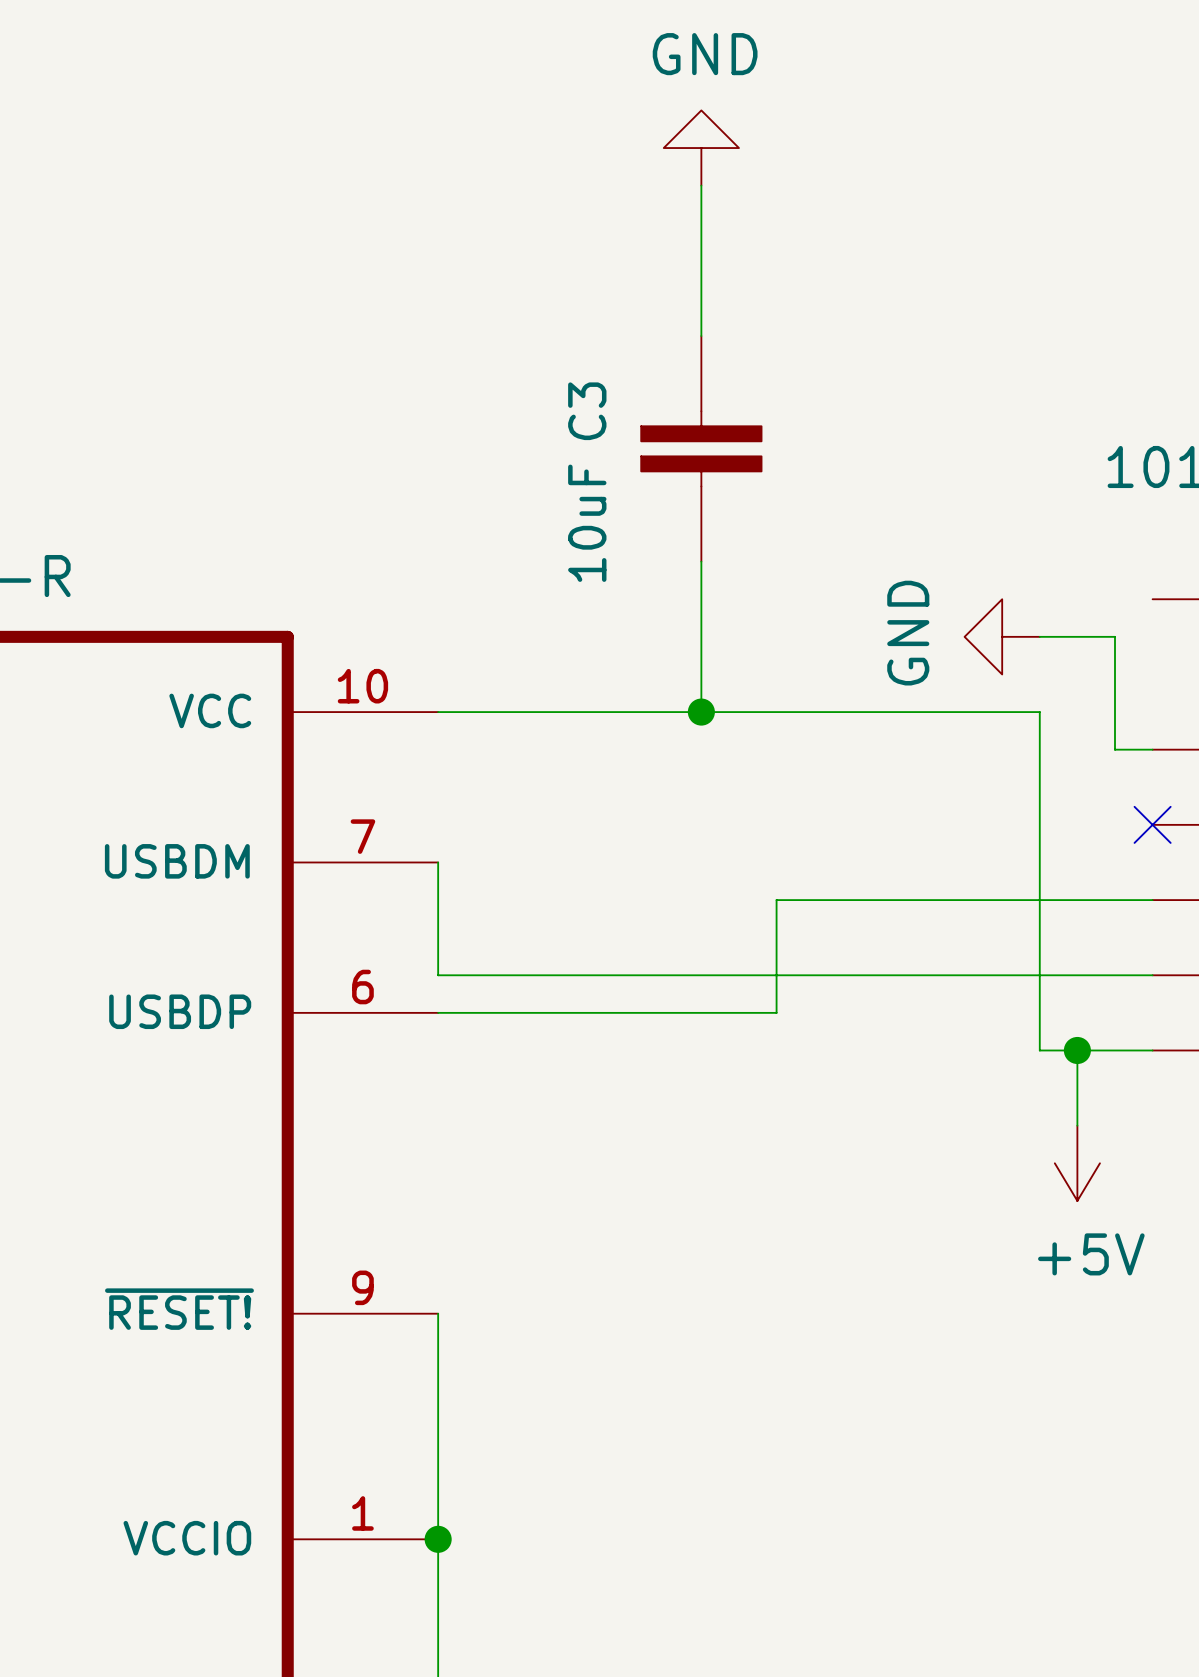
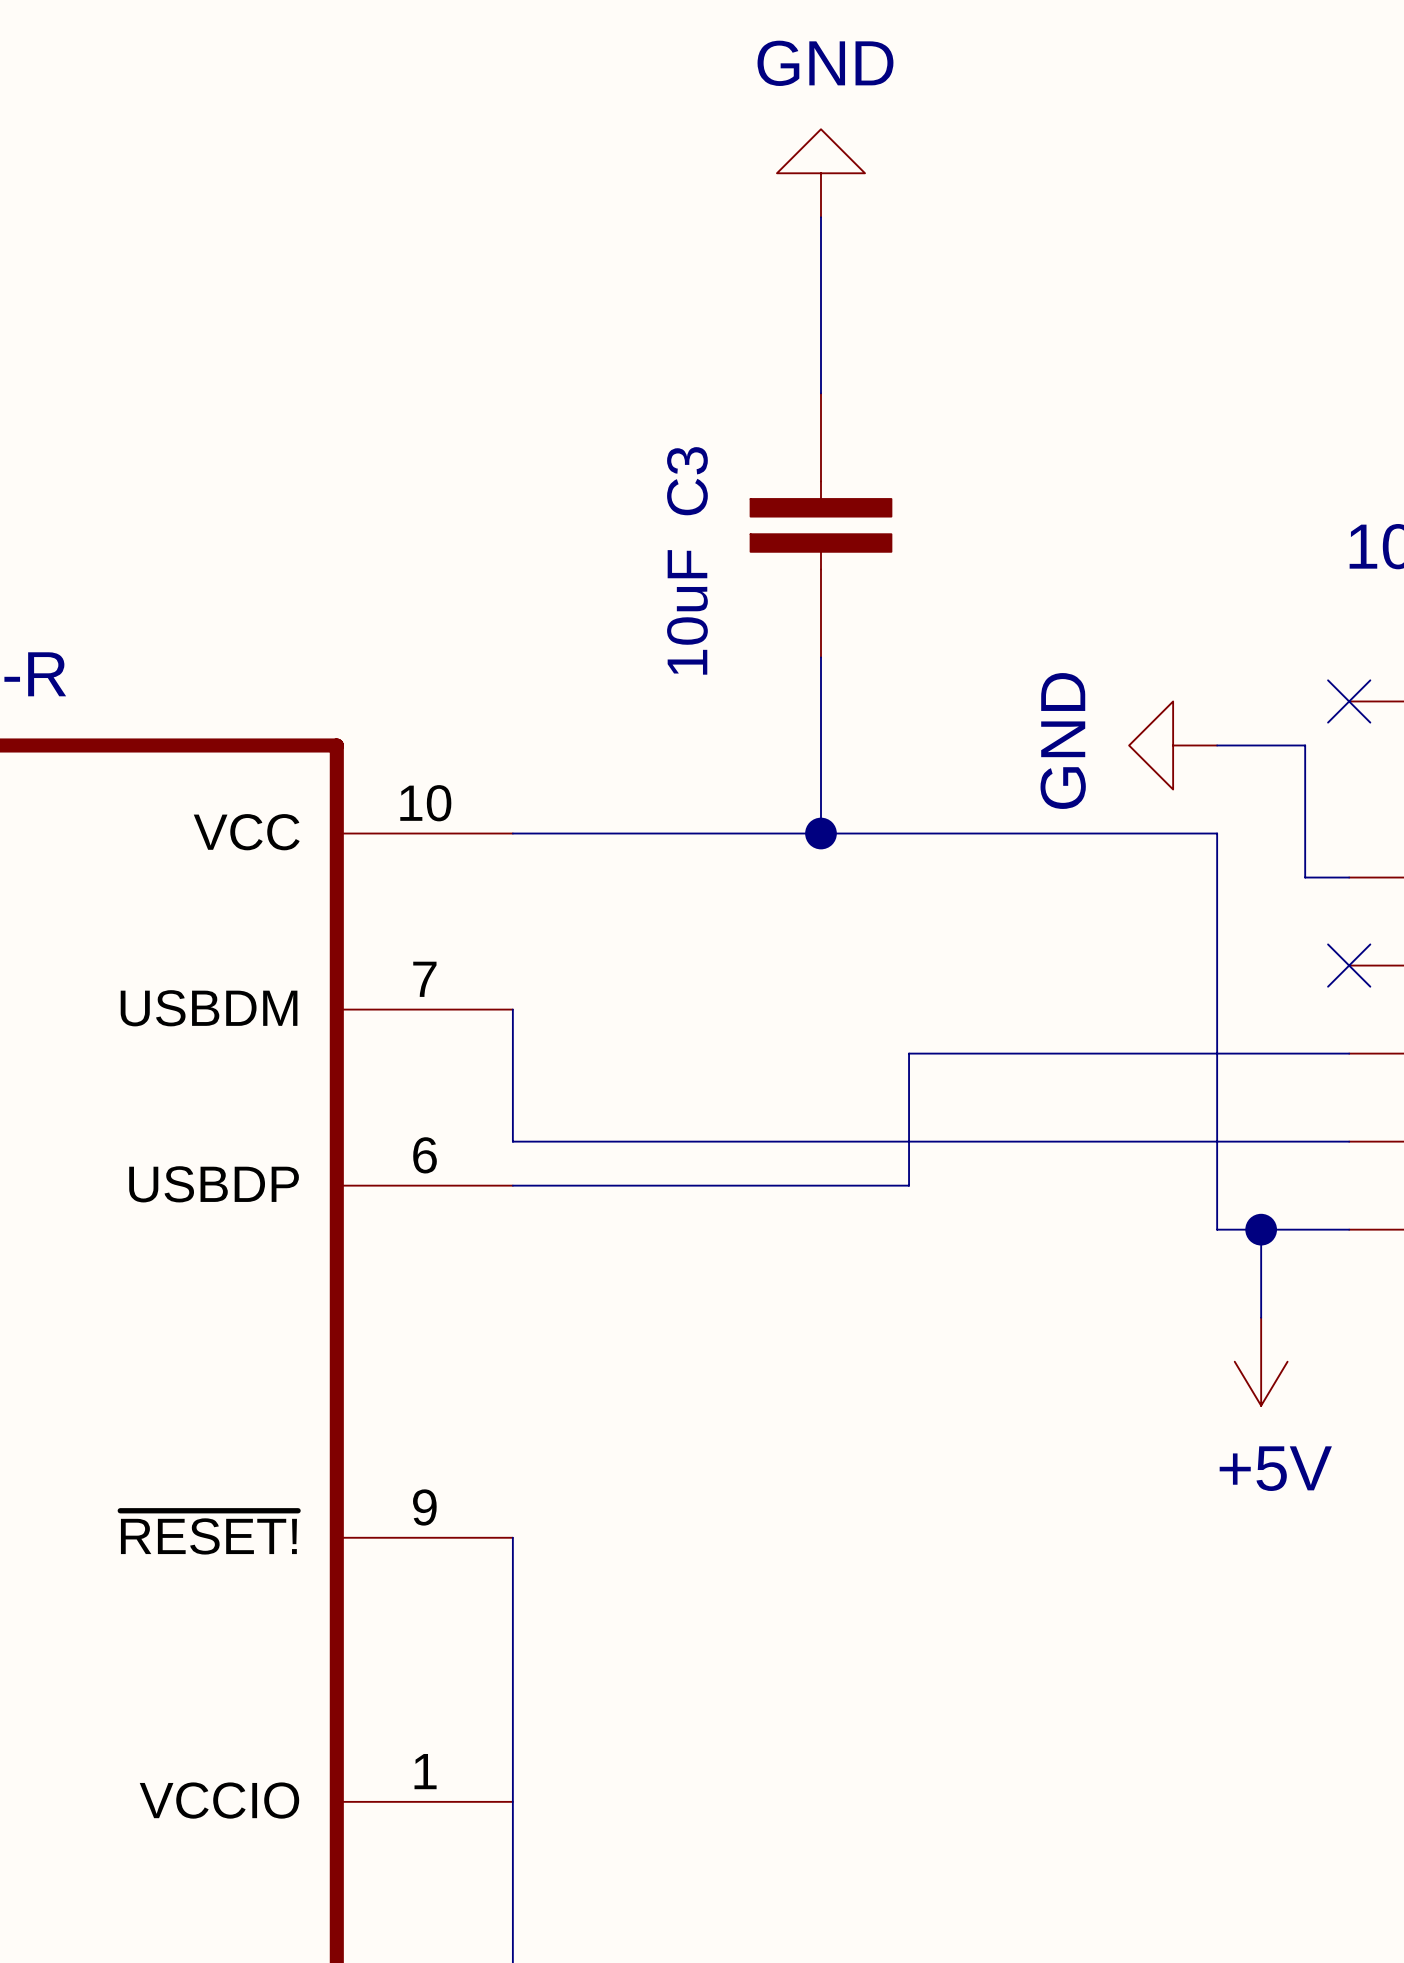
no-connect mark: none -> (1349, 701)
junction: (438, 1539) -> none

